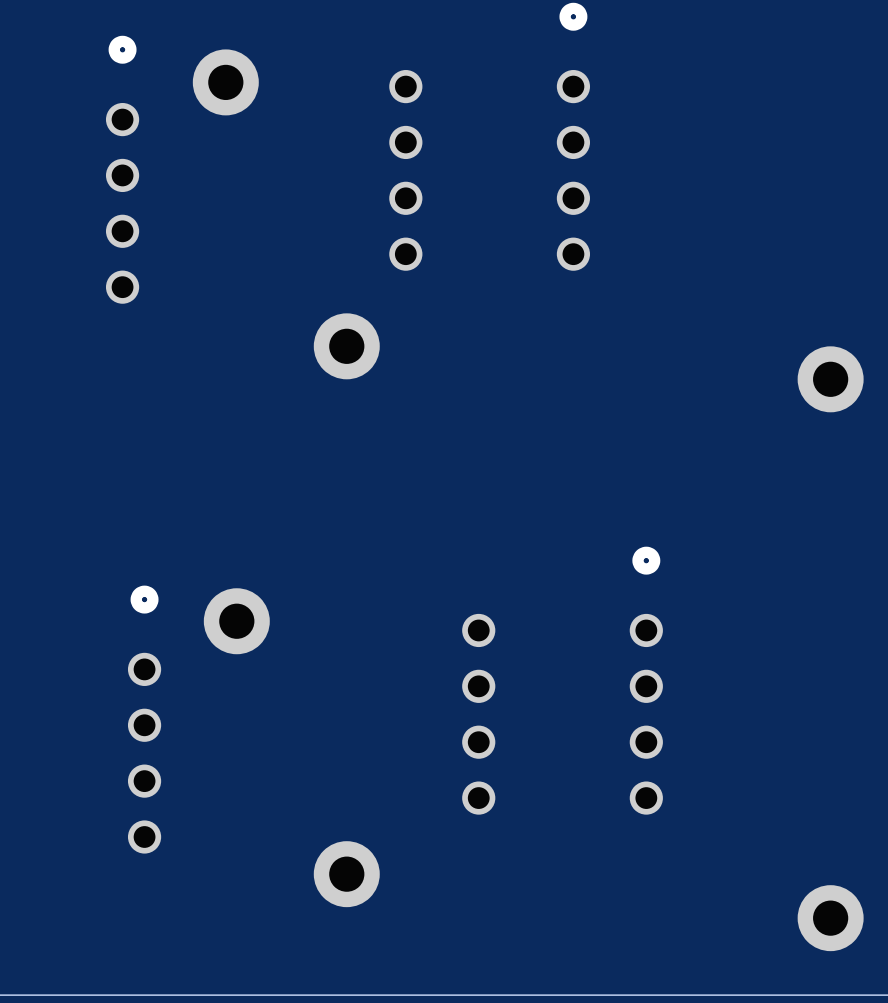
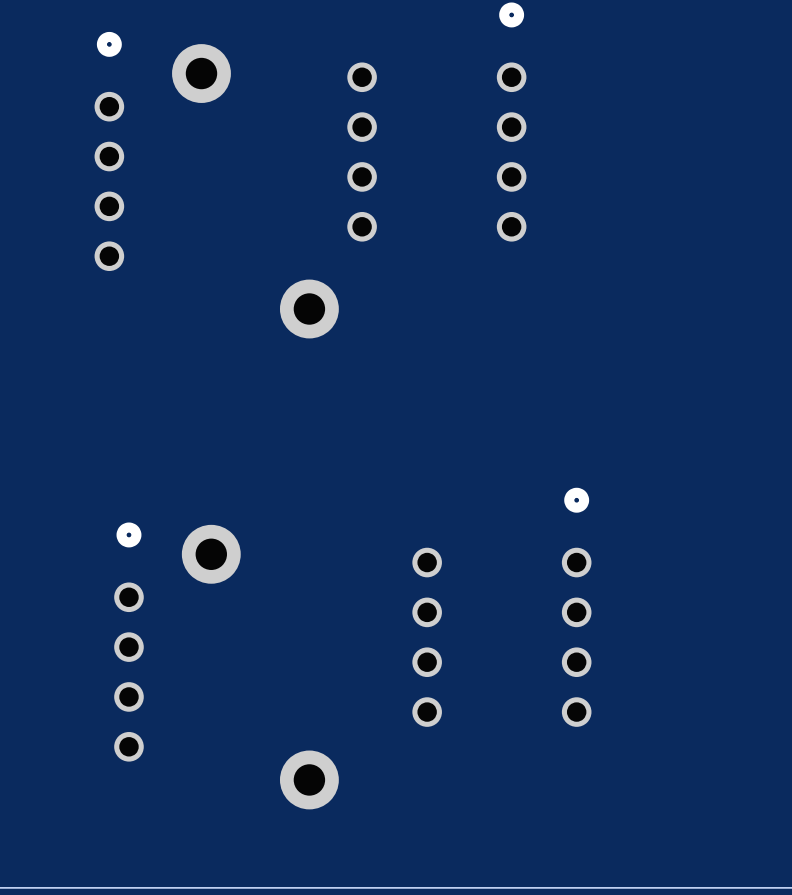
part: (830, 379) -> none
part: (830, 918) -> none

